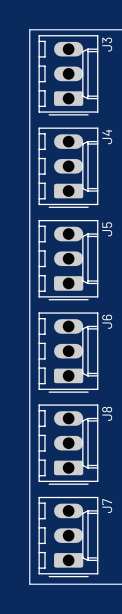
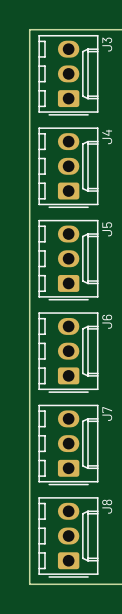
J3 footprint: [38, 35, 99, 116] -> [38, 35, 99, 116]
J4 footprint: [38, 127, 99, 208] -> [38, 127, 99, 208]
J5 footprint: [38, 220, 99, 301] -> [38, 220, 99, 301]
J6 footprint: [38, 312, 99, 393] -> [38, 312, 99, 393]
J8 footprint: [38, 404, 99, 485] -> [38, 497, 99, 578]
J7 footprint: [38, 496, 99, 578] -> [38, 404, 99, 486]

